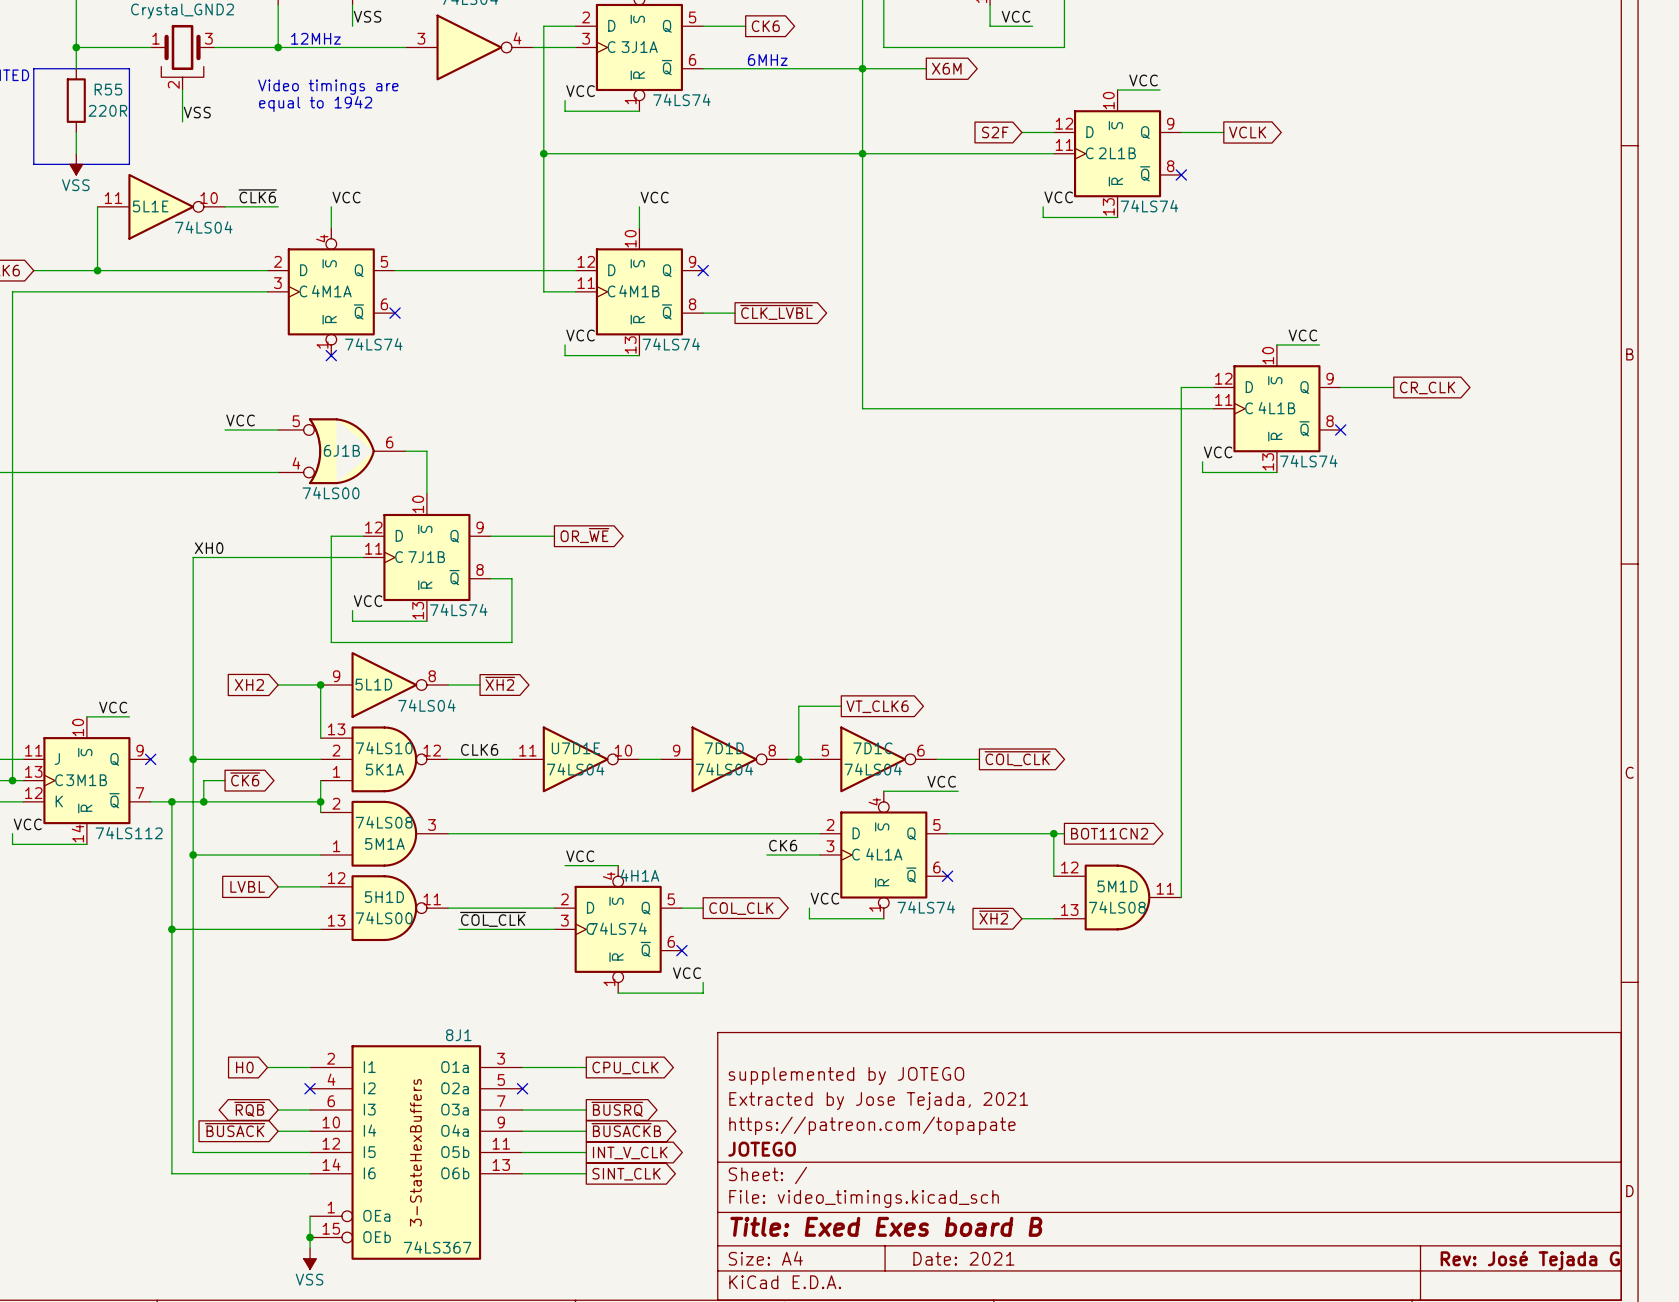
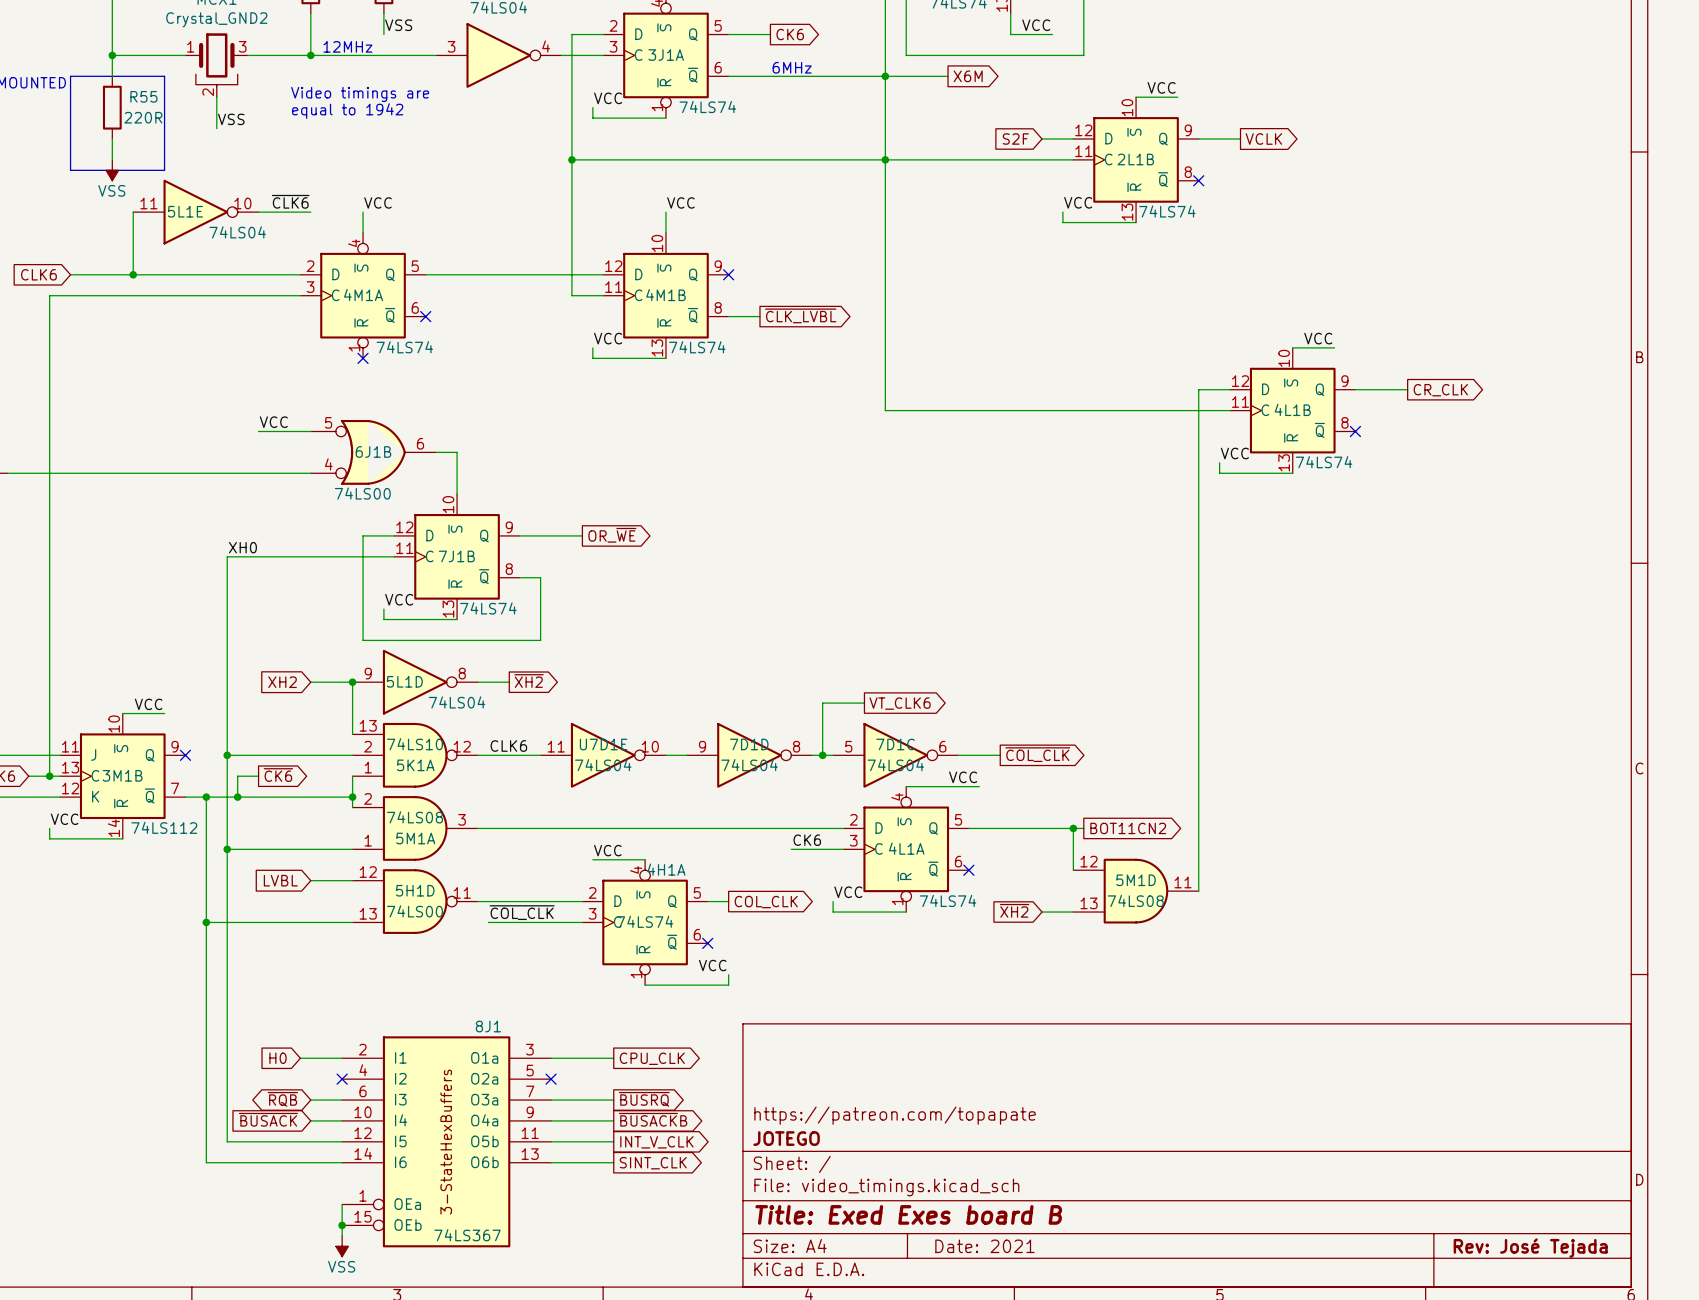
title block: supplemented by JOTEGO (846, 1075) -> none
title block: Extracted by Jose Tejada, 2021 (878, 1101) -> none
title block: Rev: José Tejada G (1530, 1260) -> Rev: José Tejada (1530, 1248)

